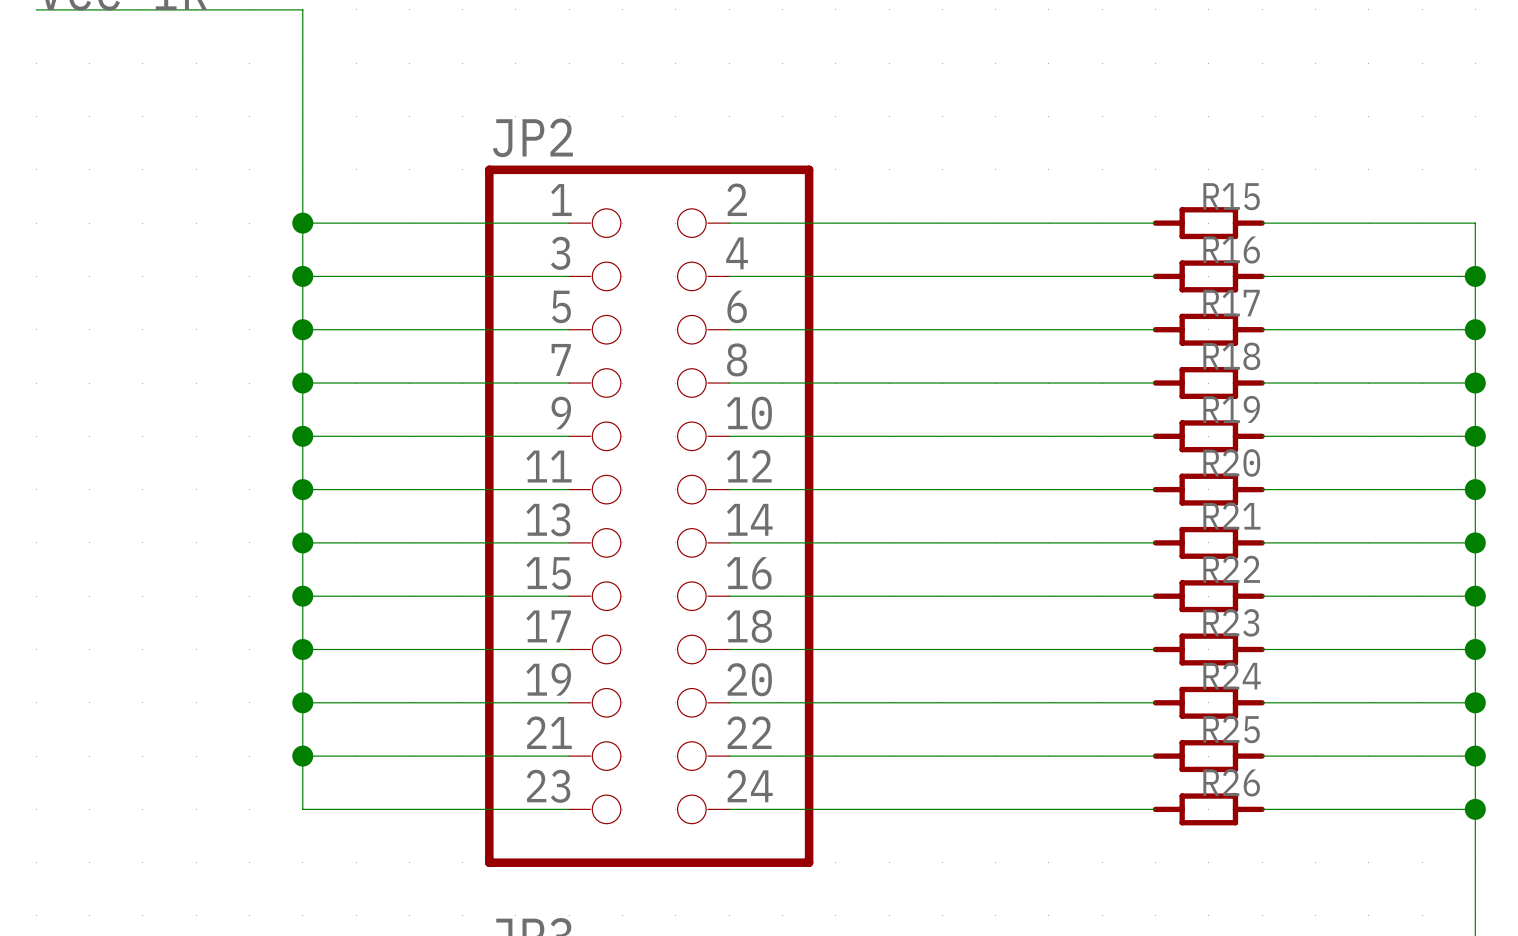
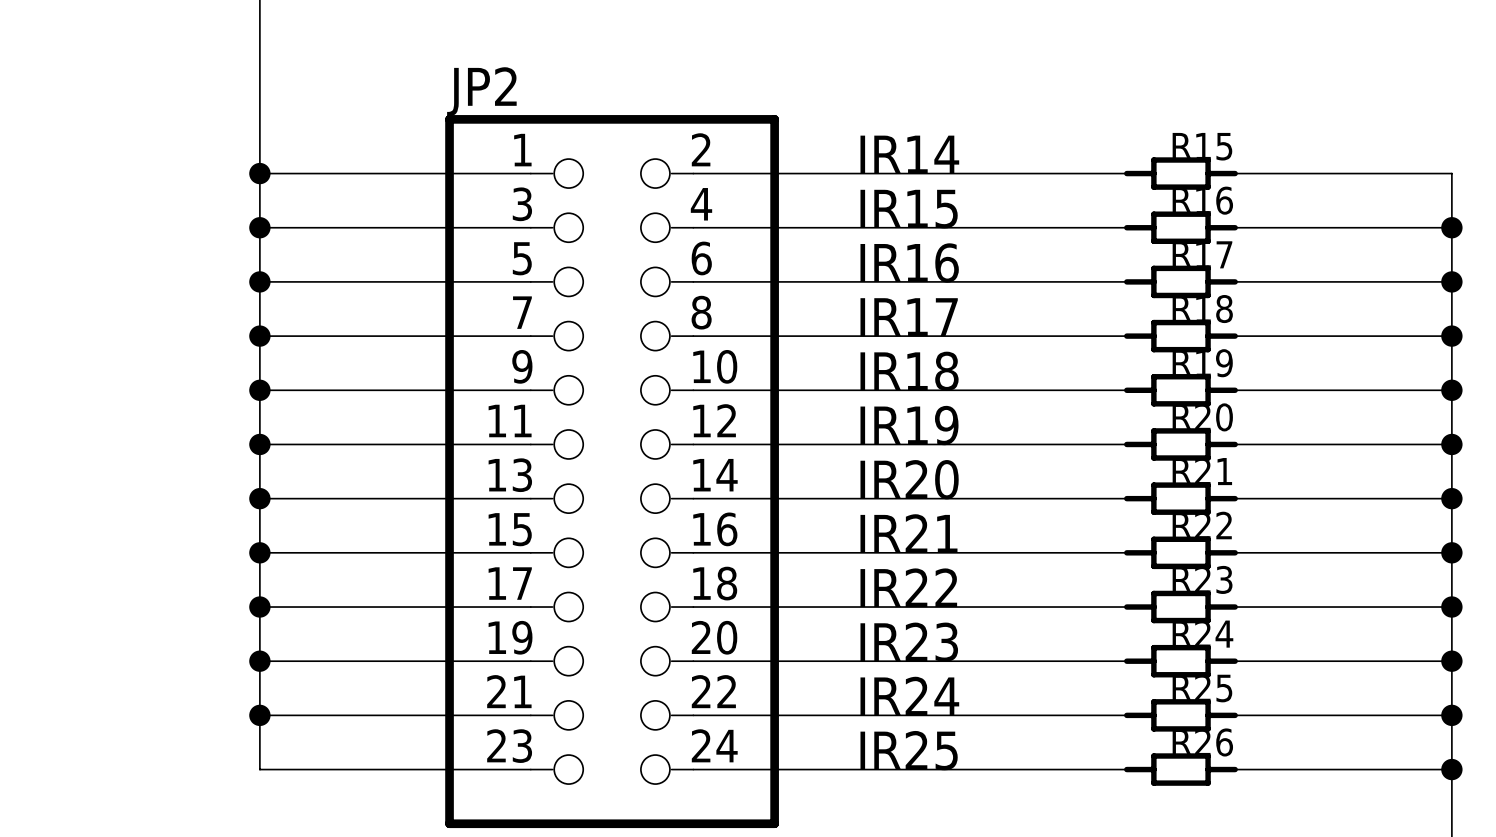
label: none -> IR14 (909, 154)
label: none -> IR15 (909, 209)
label: none -> IR16 (909, 262)
label: none -> IR17 (909, 317)
label: none -> IR18 (909, 371)
label: none -> IR19 (909, 425)
label: none -> IR20 (909, 479)
label: none -> IR21 (908, 533)
label: none -> IR22 (908, 587)
label: none -> IR23 (909, 642)
label: none -> IR24 (909, 696)
label: none -> IR25 (909, 750)

